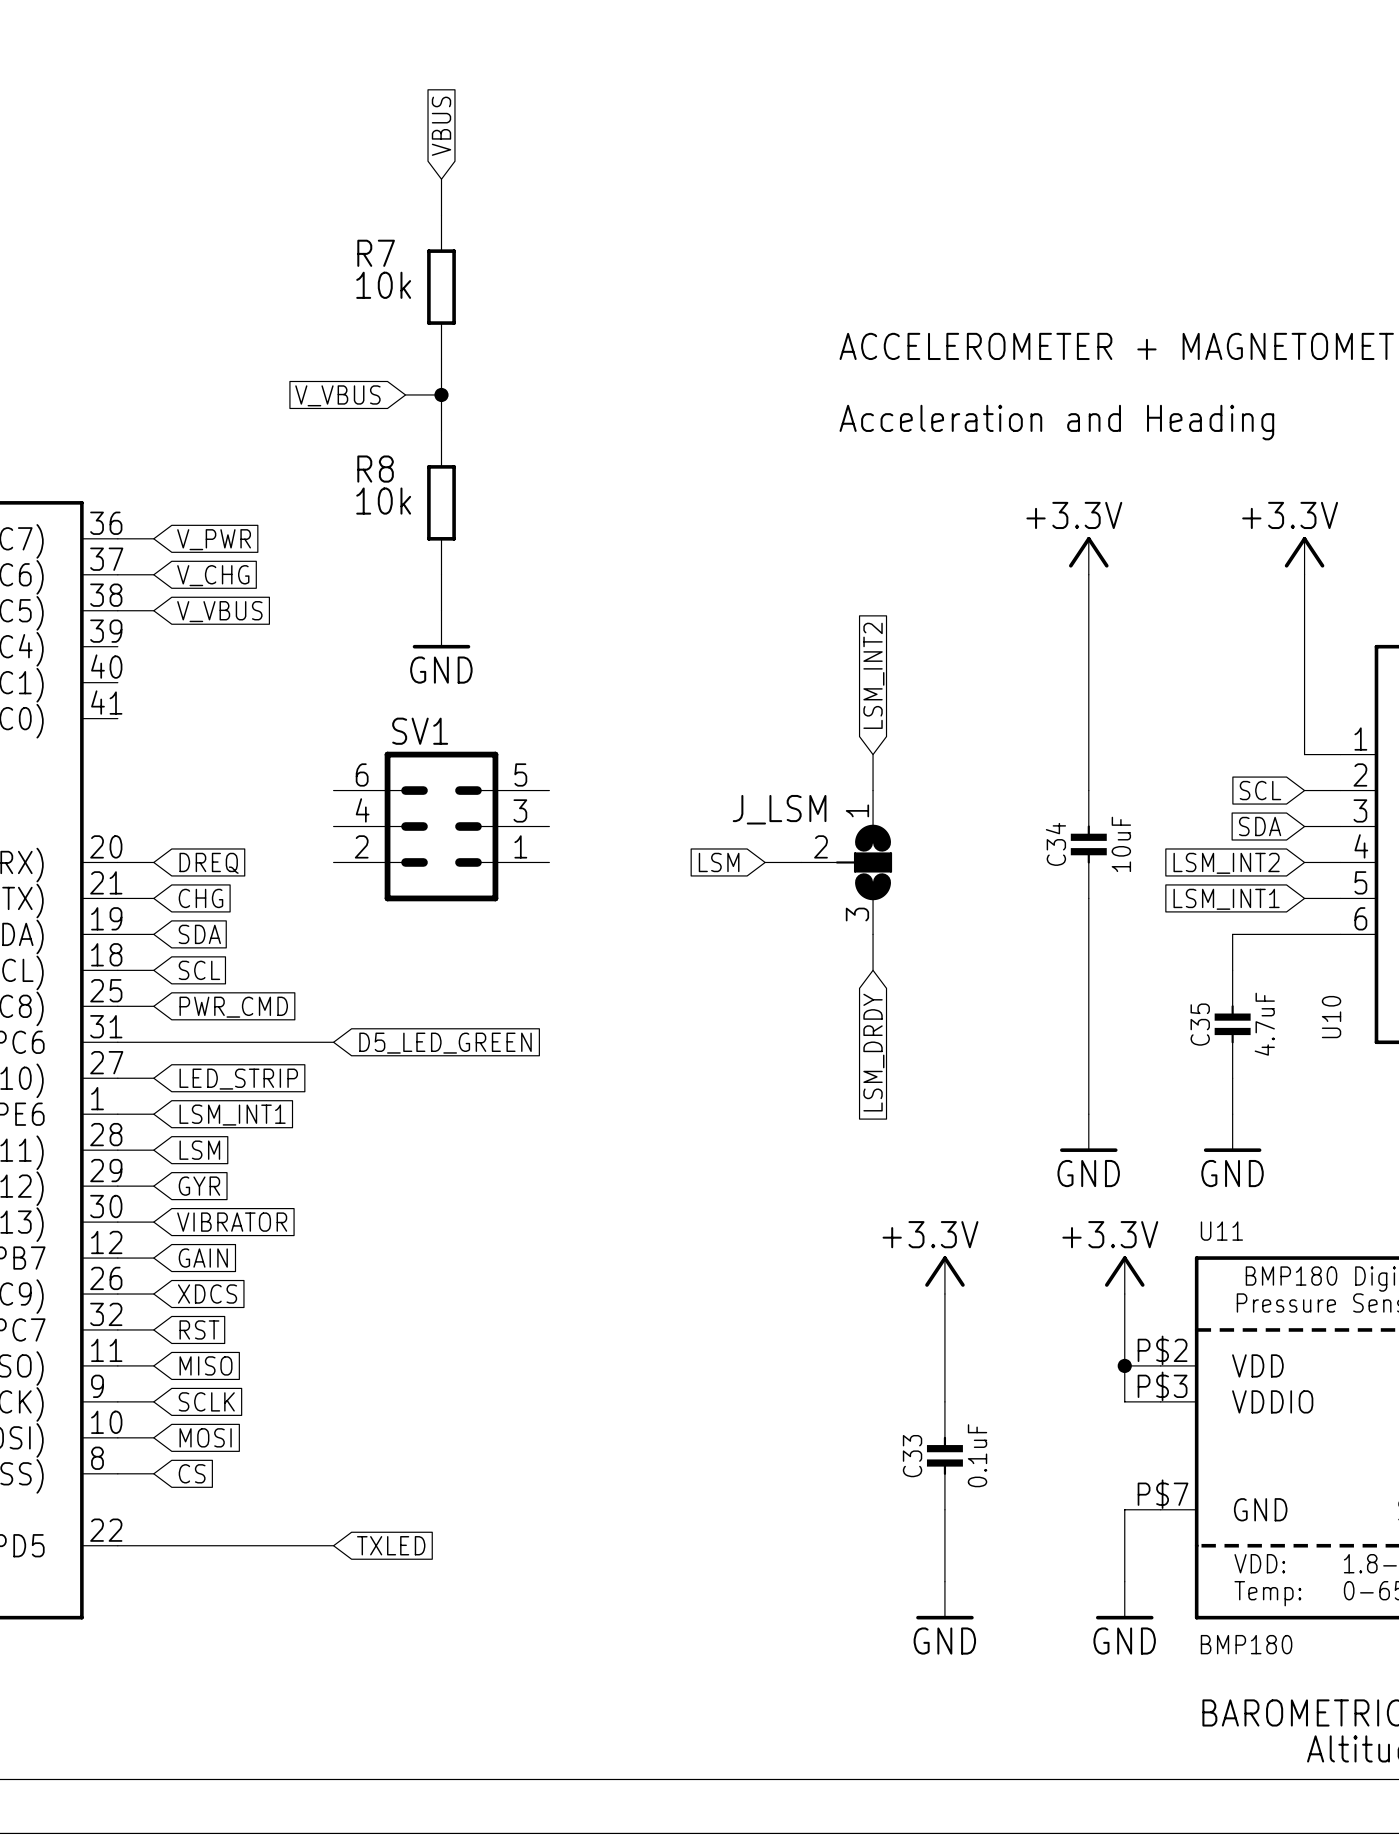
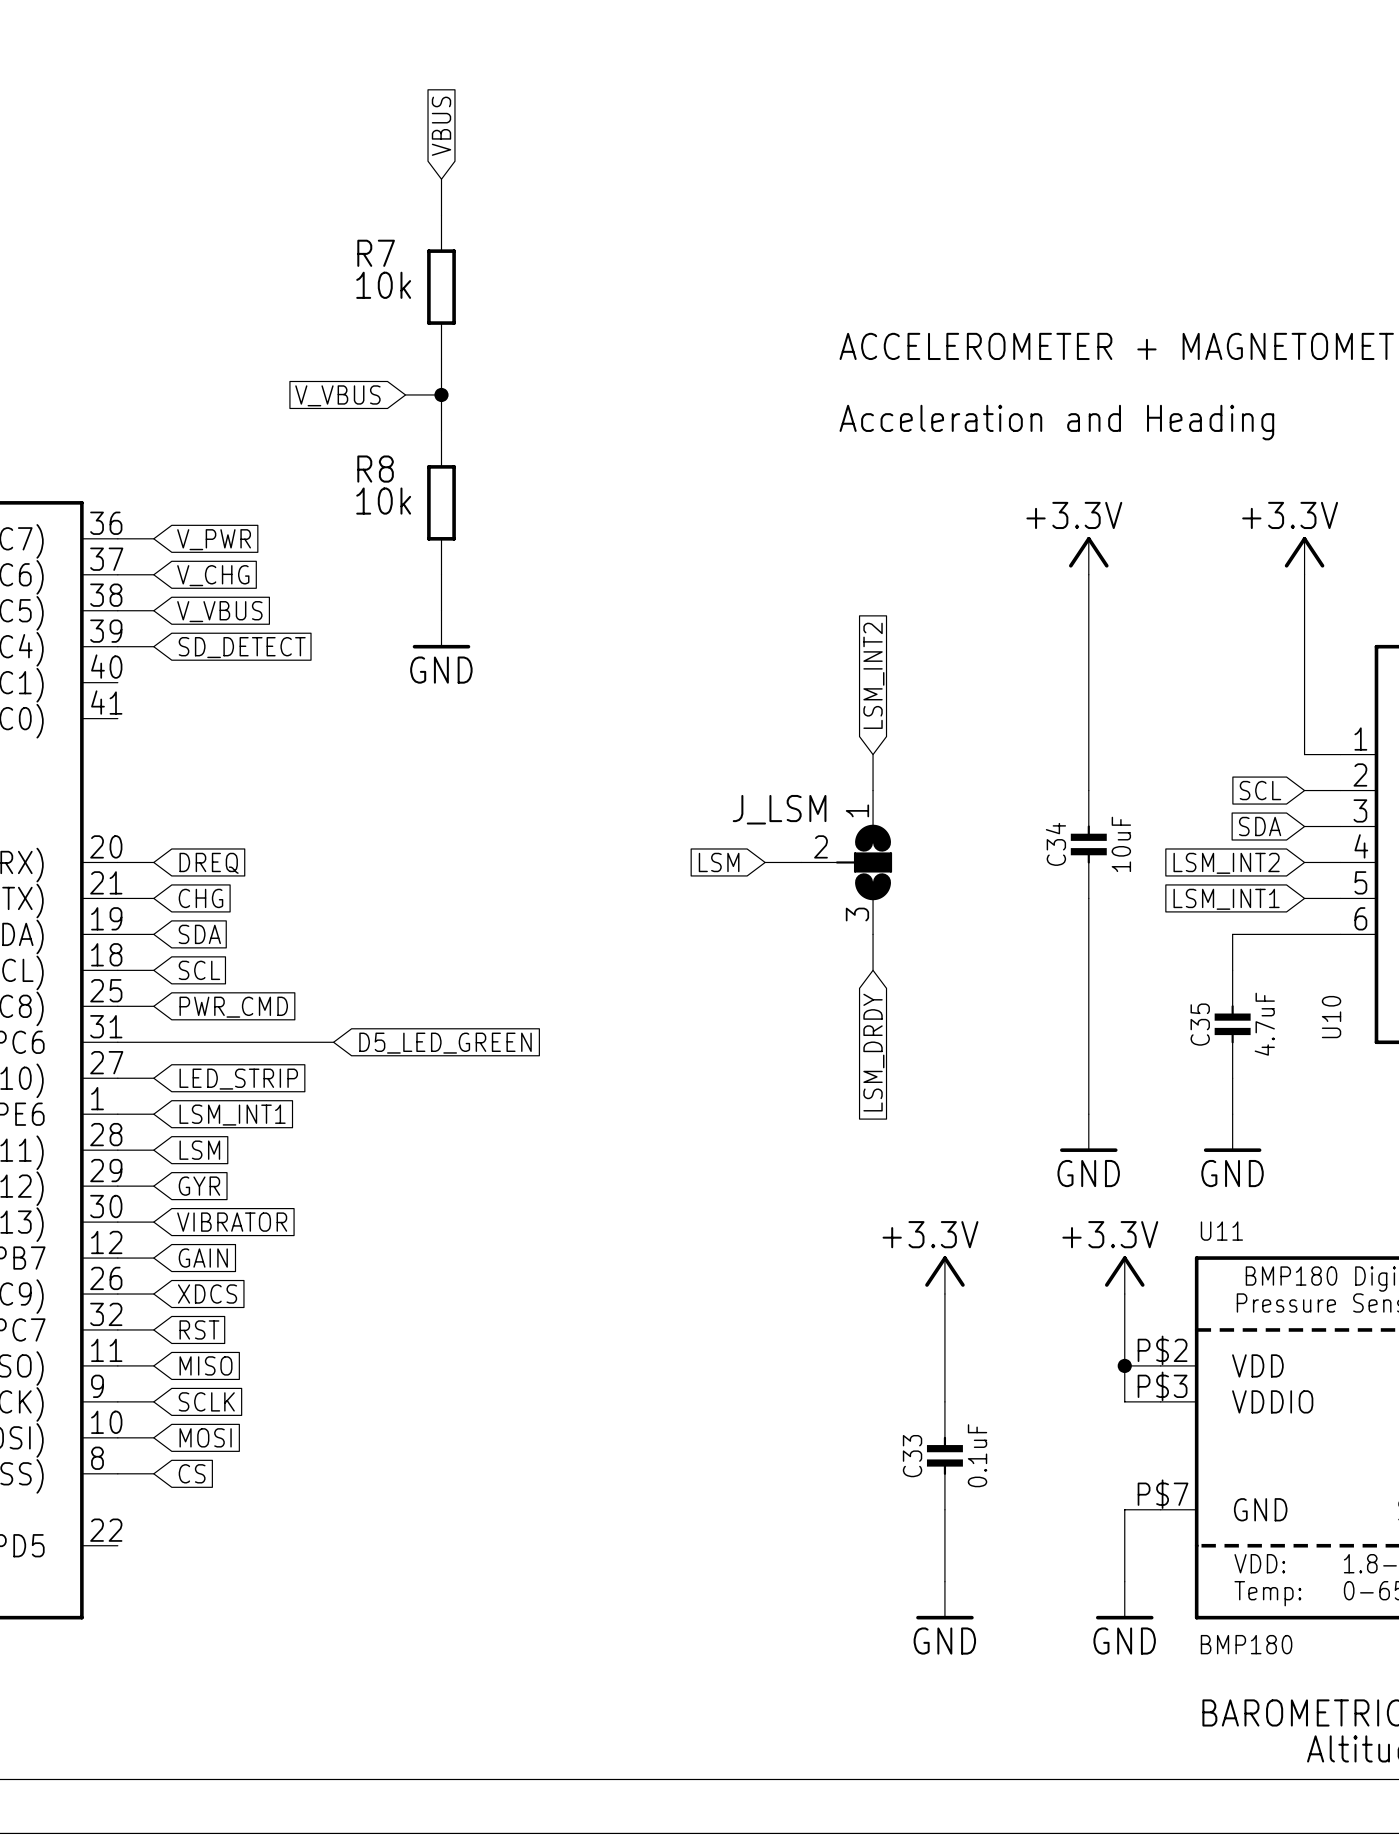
wire: none -> (117, 646) (153, 646)
global label: none -> SD_DETECT (242, 647)
SV1: (441, 826) -> none
wire: (117, 1545) (333, 1545) -> none
global label: TXLED (391, 1545) -> none

